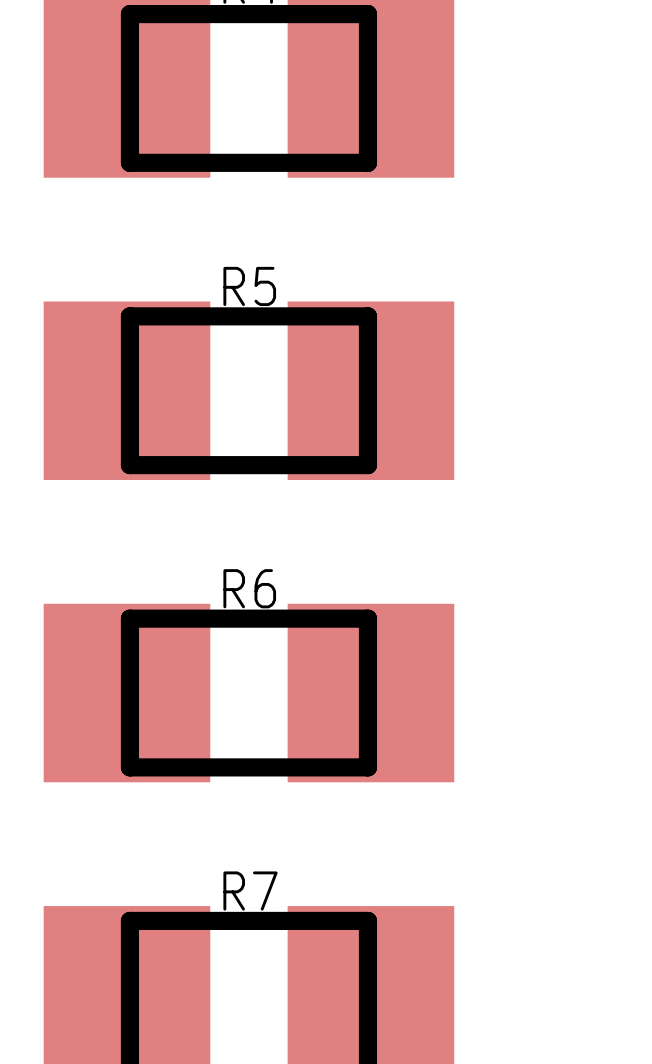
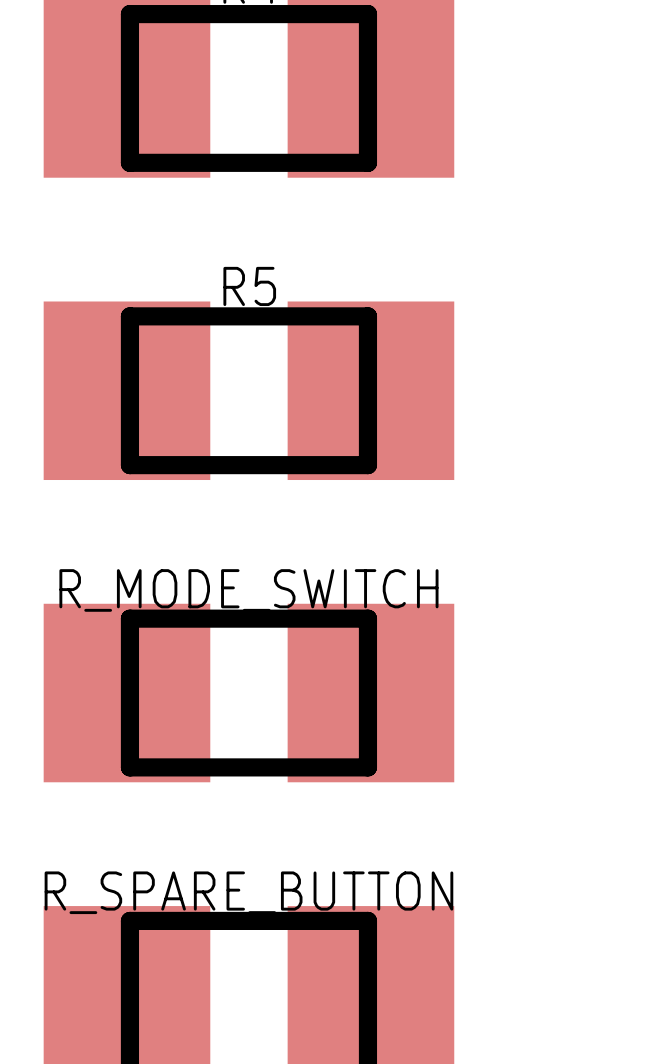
R6 name: R6 (249, 588) -> R_MODE_SWITCH (248, 590)
R7 name: R7 (250, 891) -> R_SPARE_BUTTON (248, 892)

